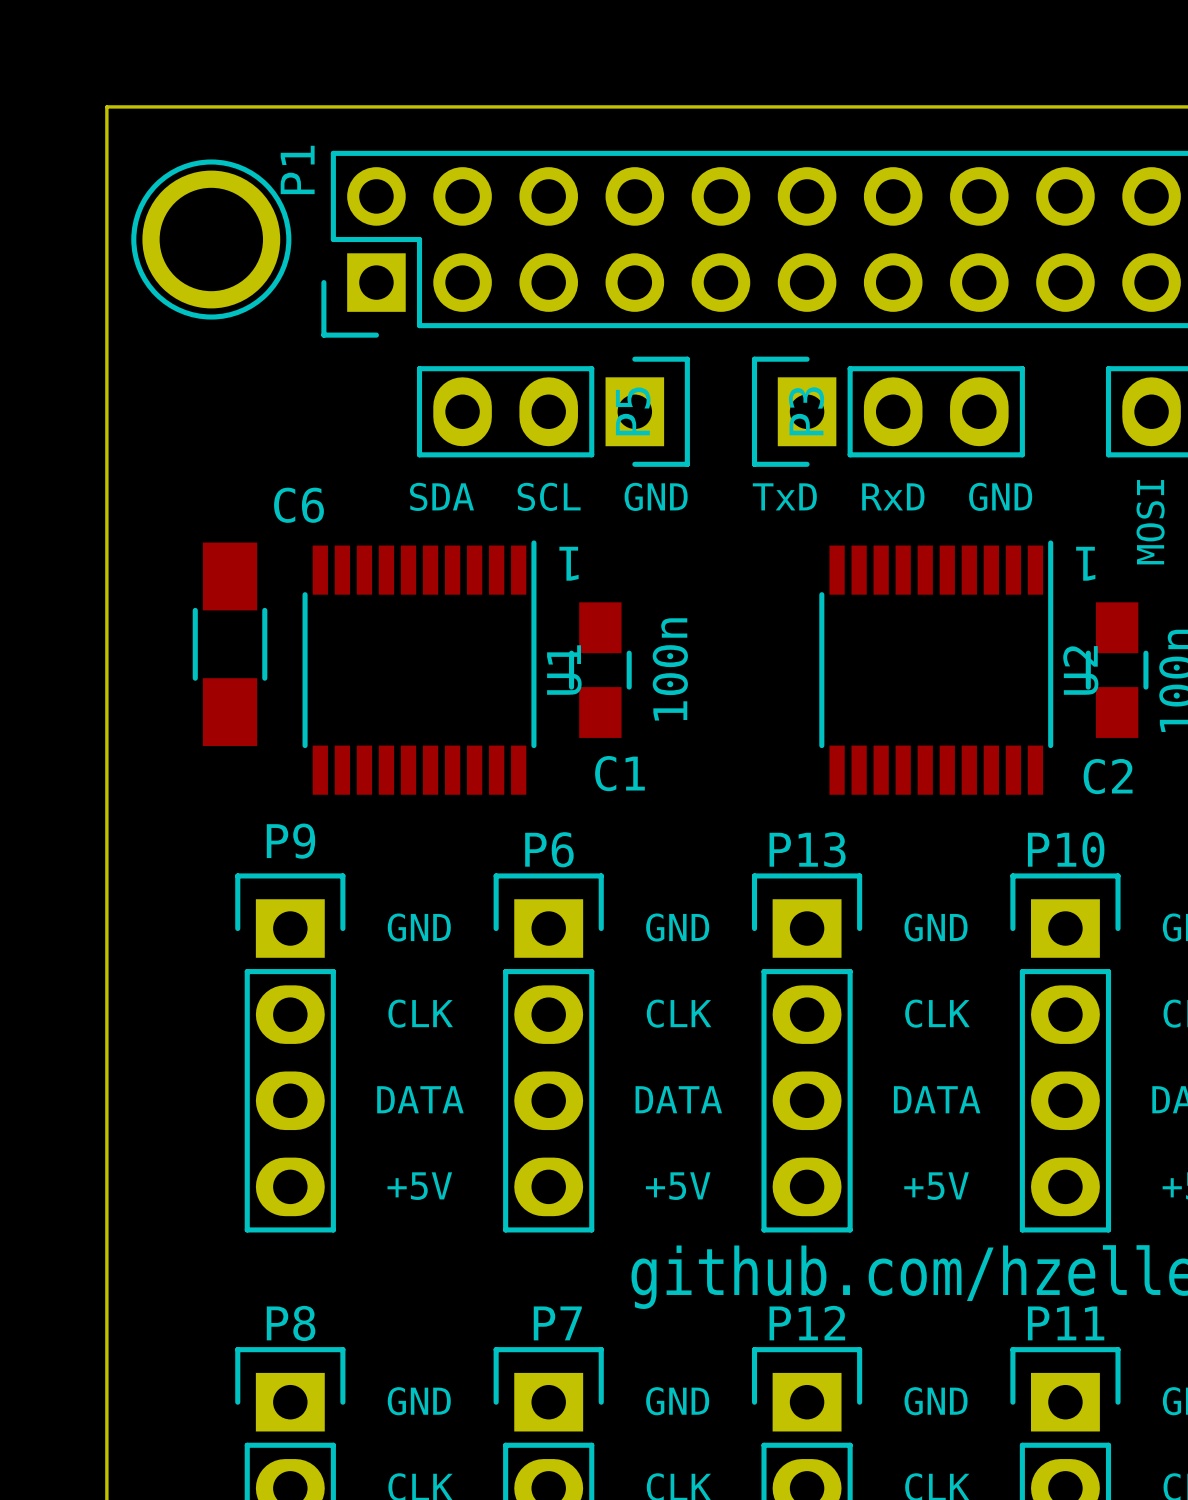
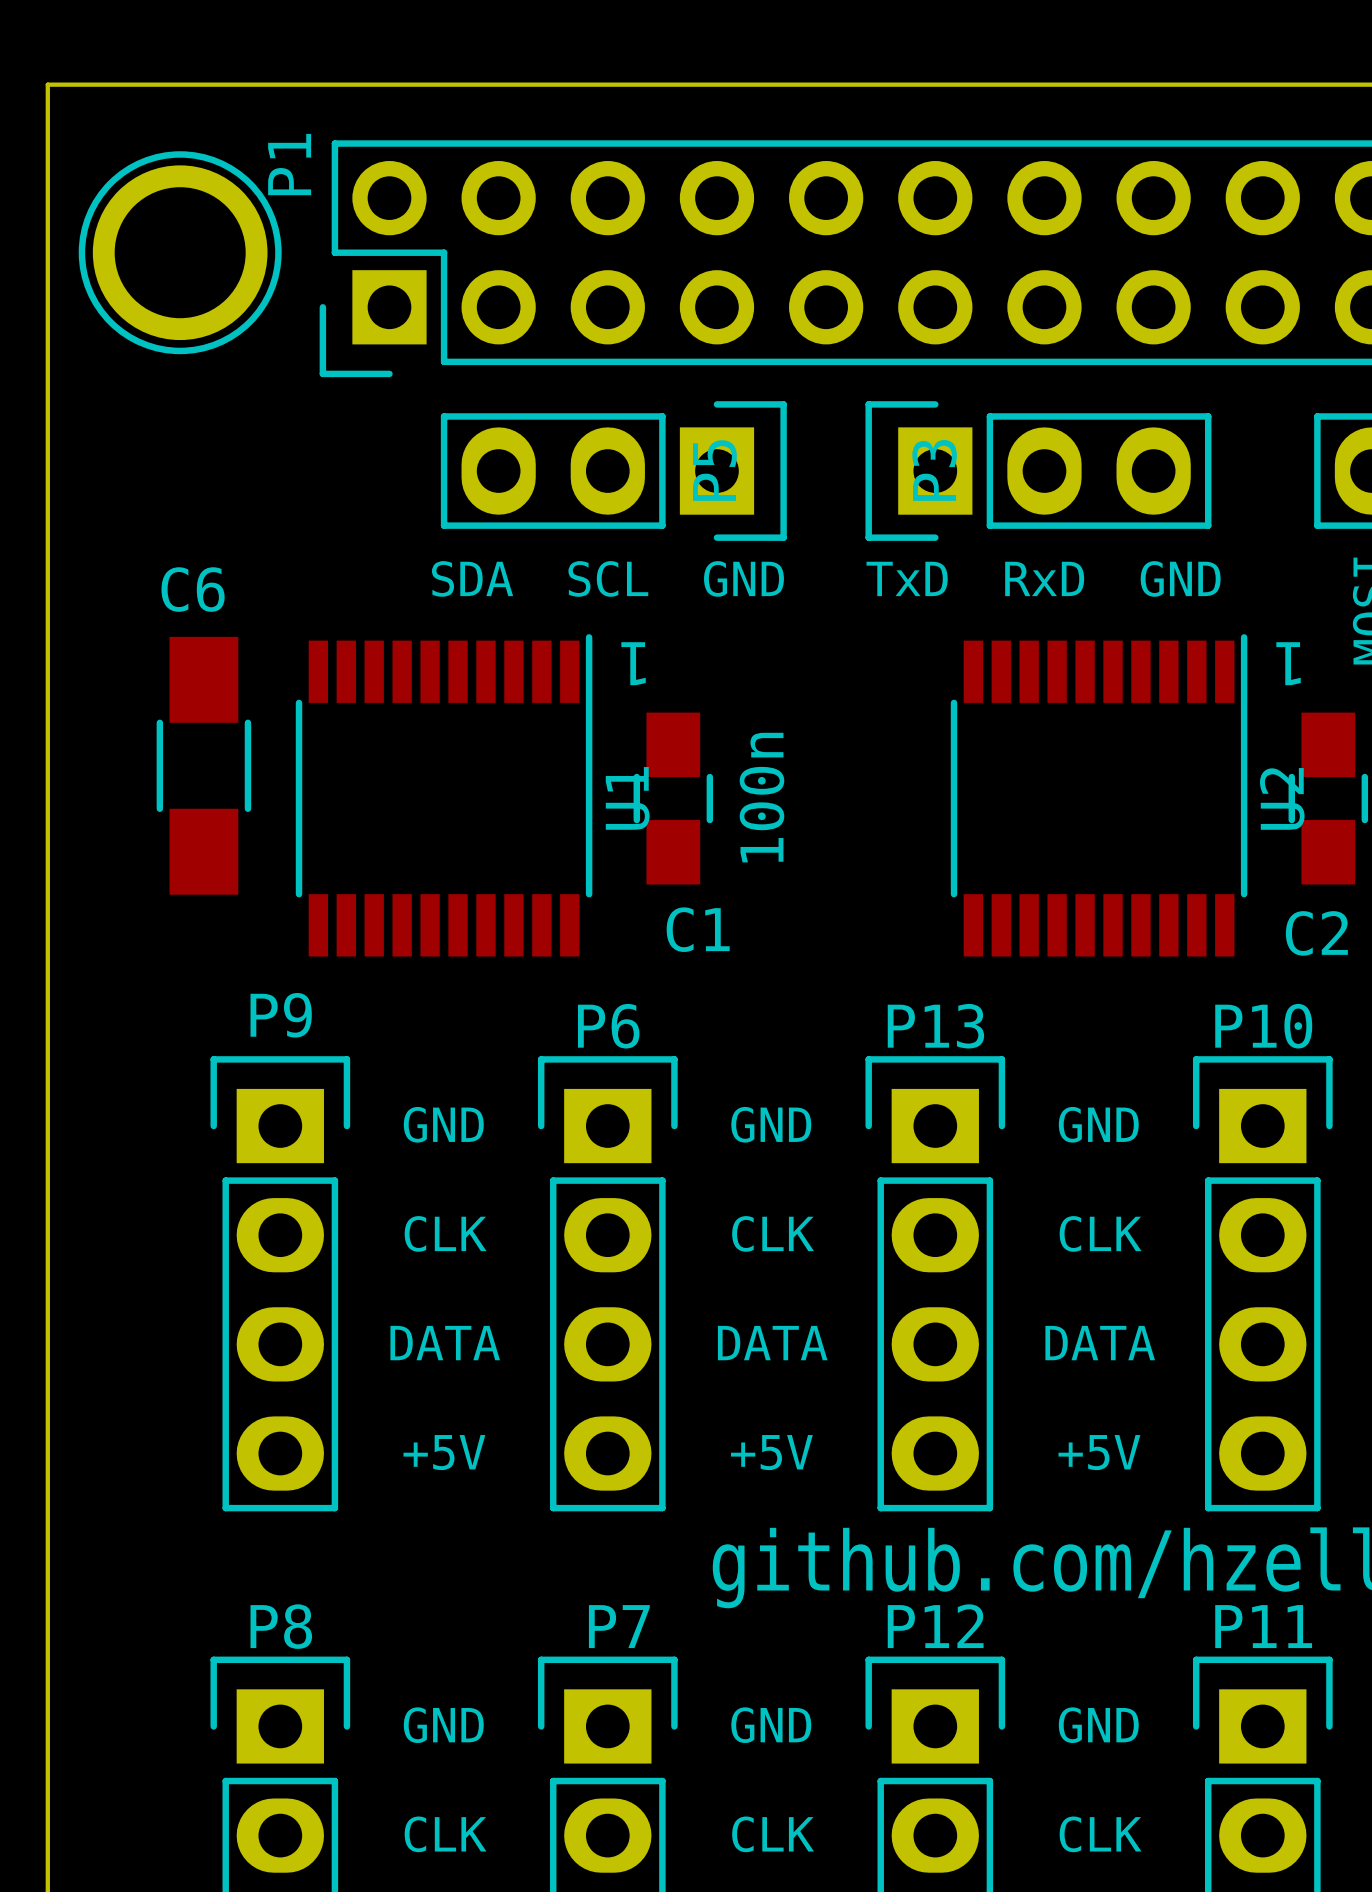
C6 name position: C6 (299, 505) -> C6 (193, 589)

